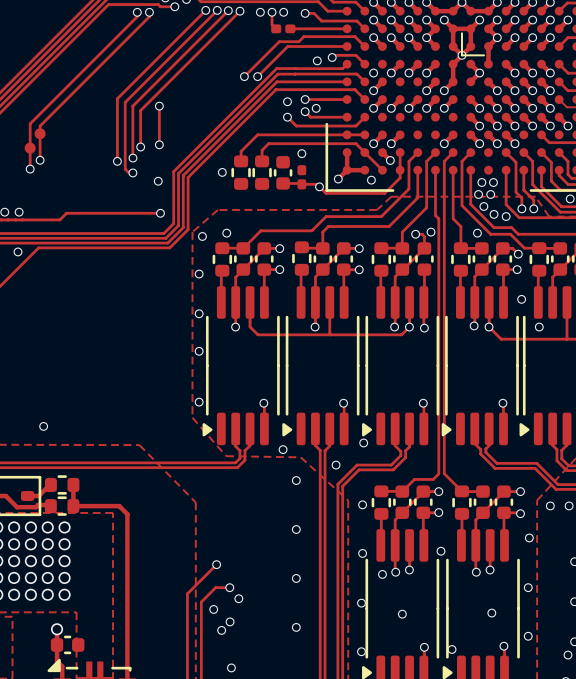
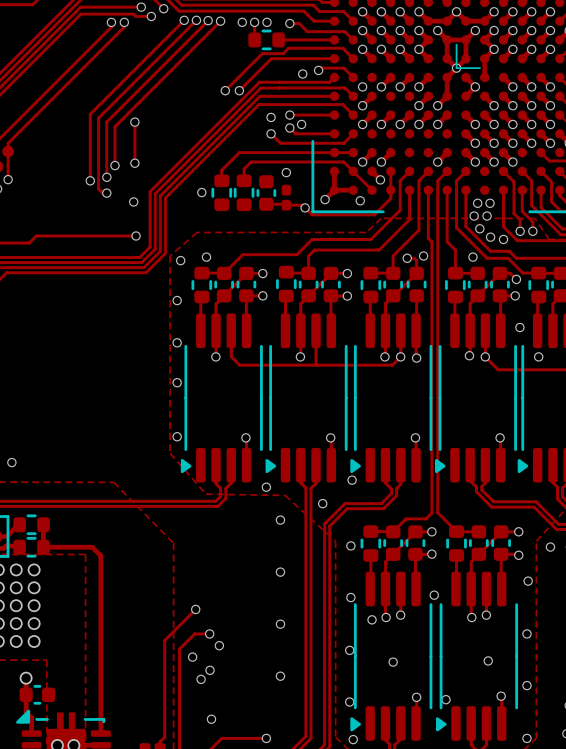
part footprint: [271, 24, 296, 34] -> [248, 29, 285, 51]

